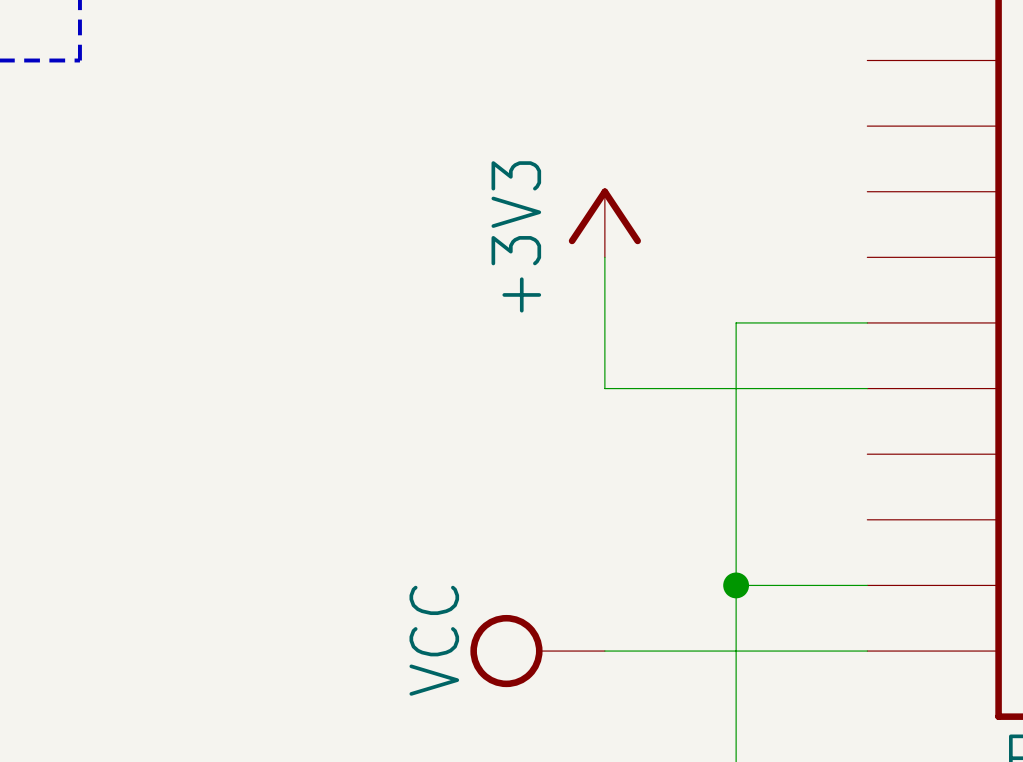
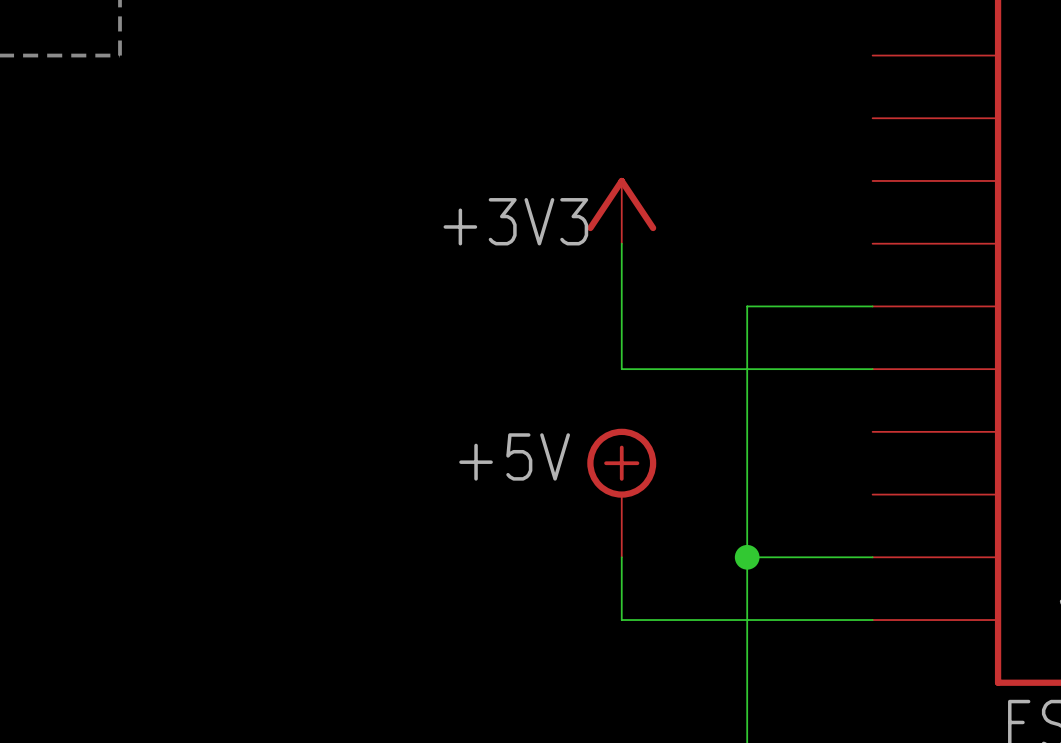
power symbol text rotation: 0° (516, 236) -> 90° clockwise (515, 221)
power symbol: none -> +5V (621, 493)
wire: none -> (621, 557) (621, 620)
power symbol: VCC (537, 651) -> none

